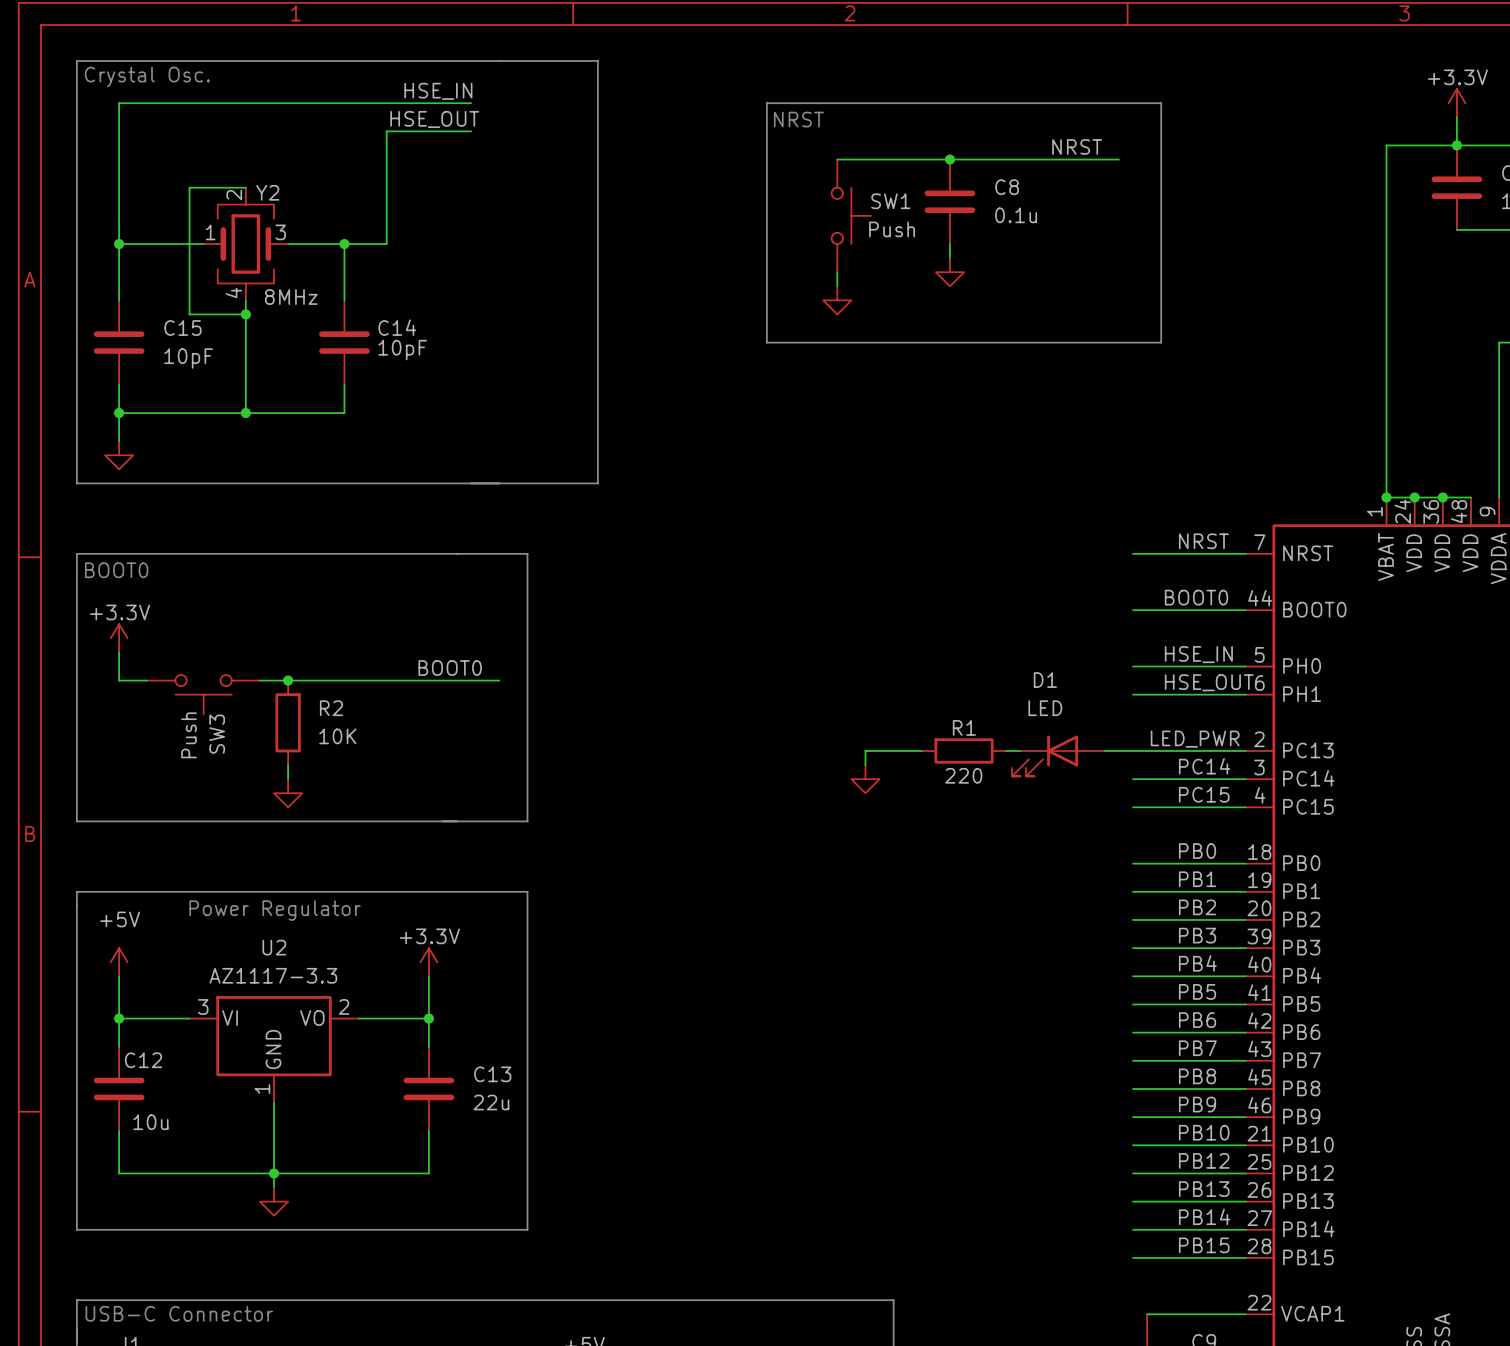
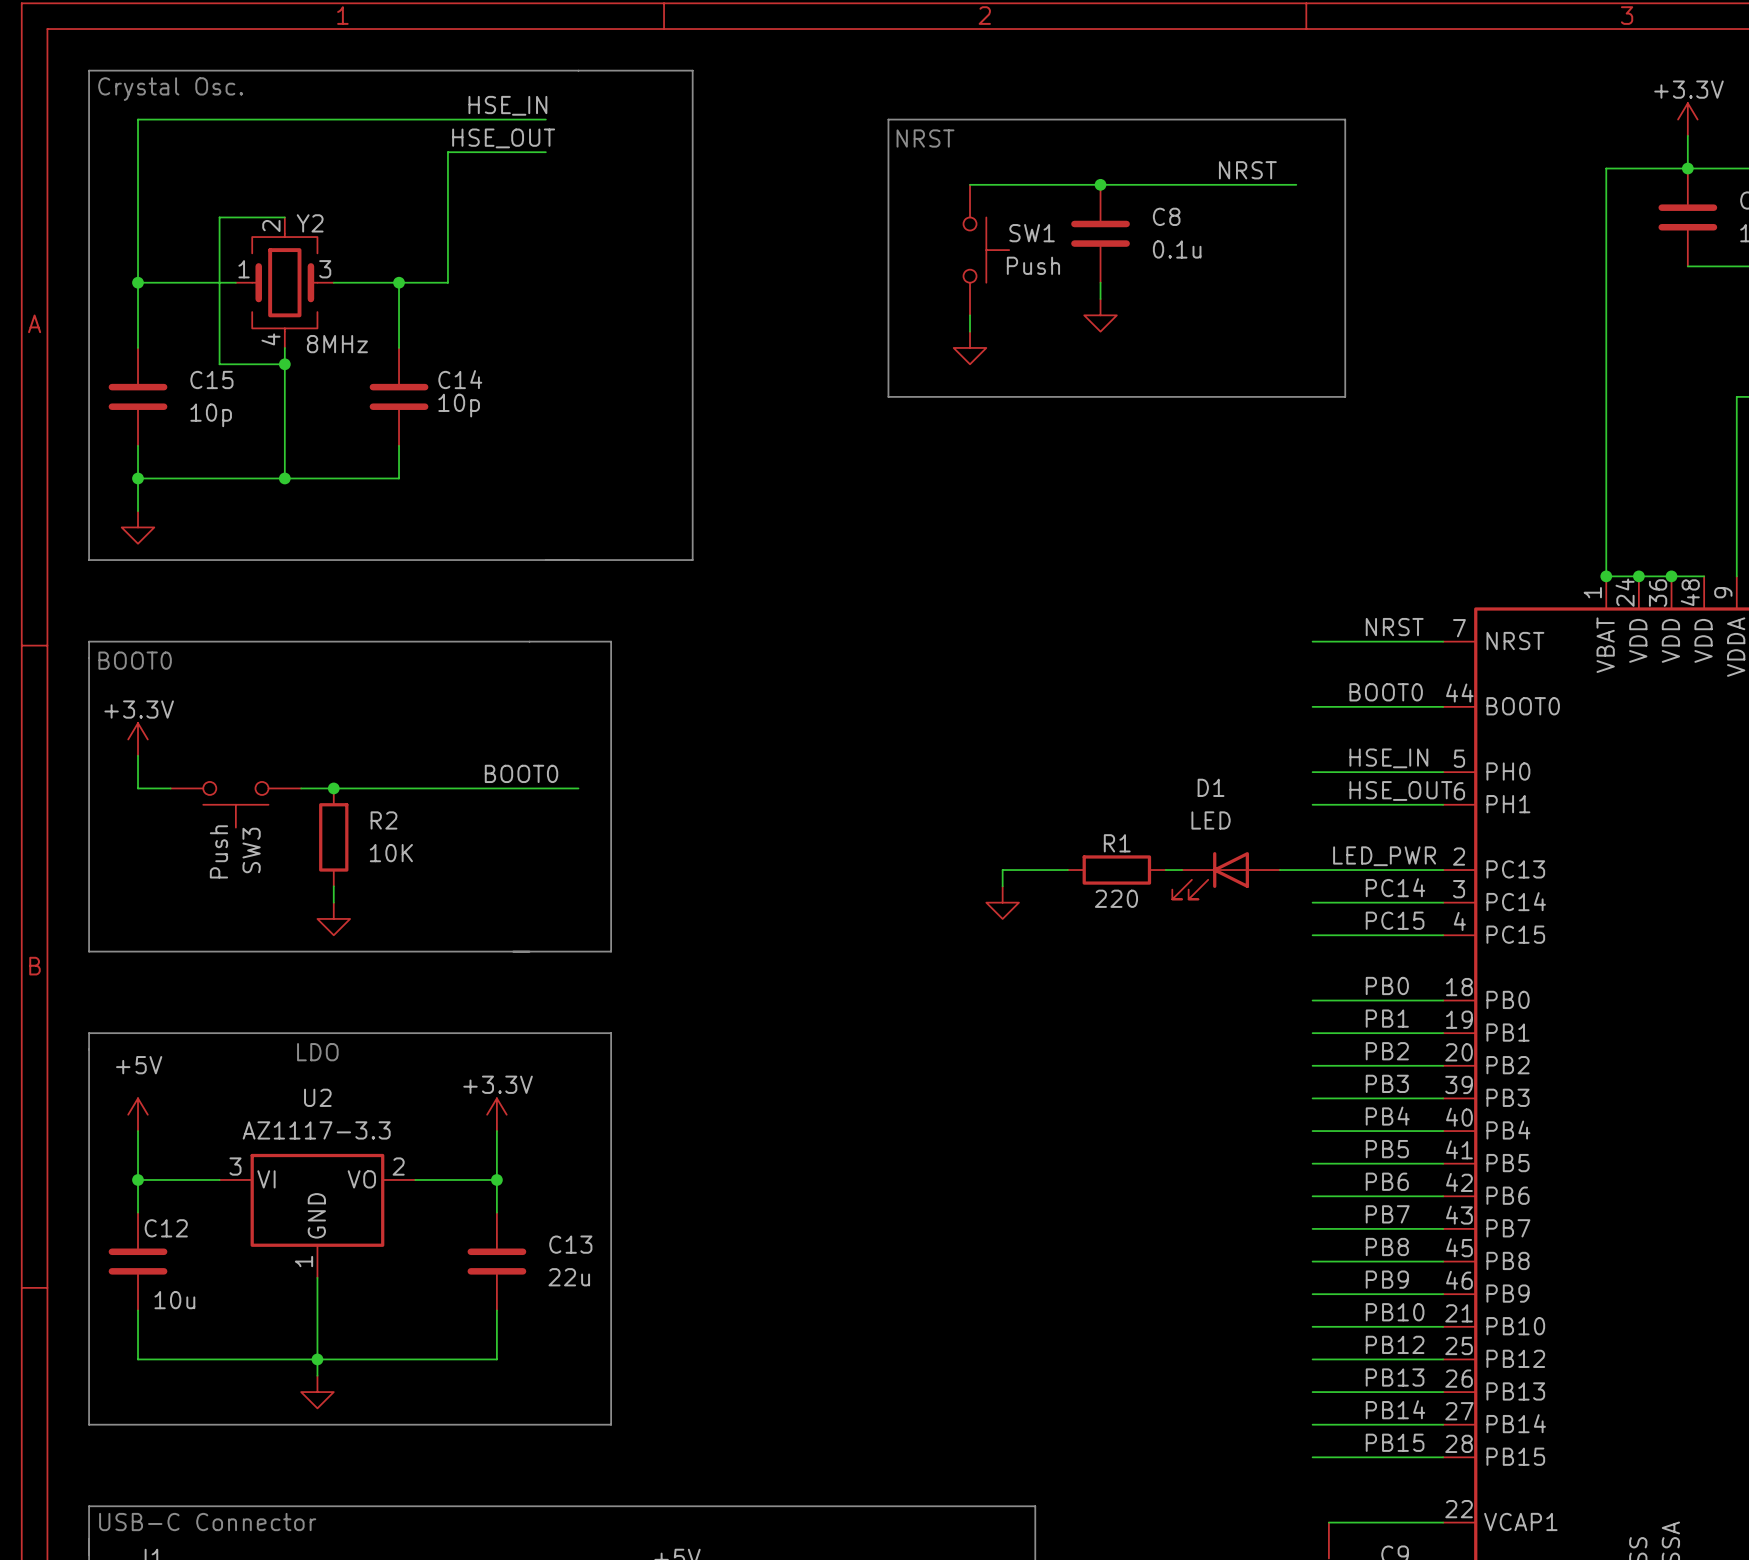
C14 value: 10pF (402, 350) -> 10p (459, 405)
C15 value: 10pF (188, 358) -> 10p (211, 415)
text: Power Regulator (275, 910) -> LDO (317, 1052)

